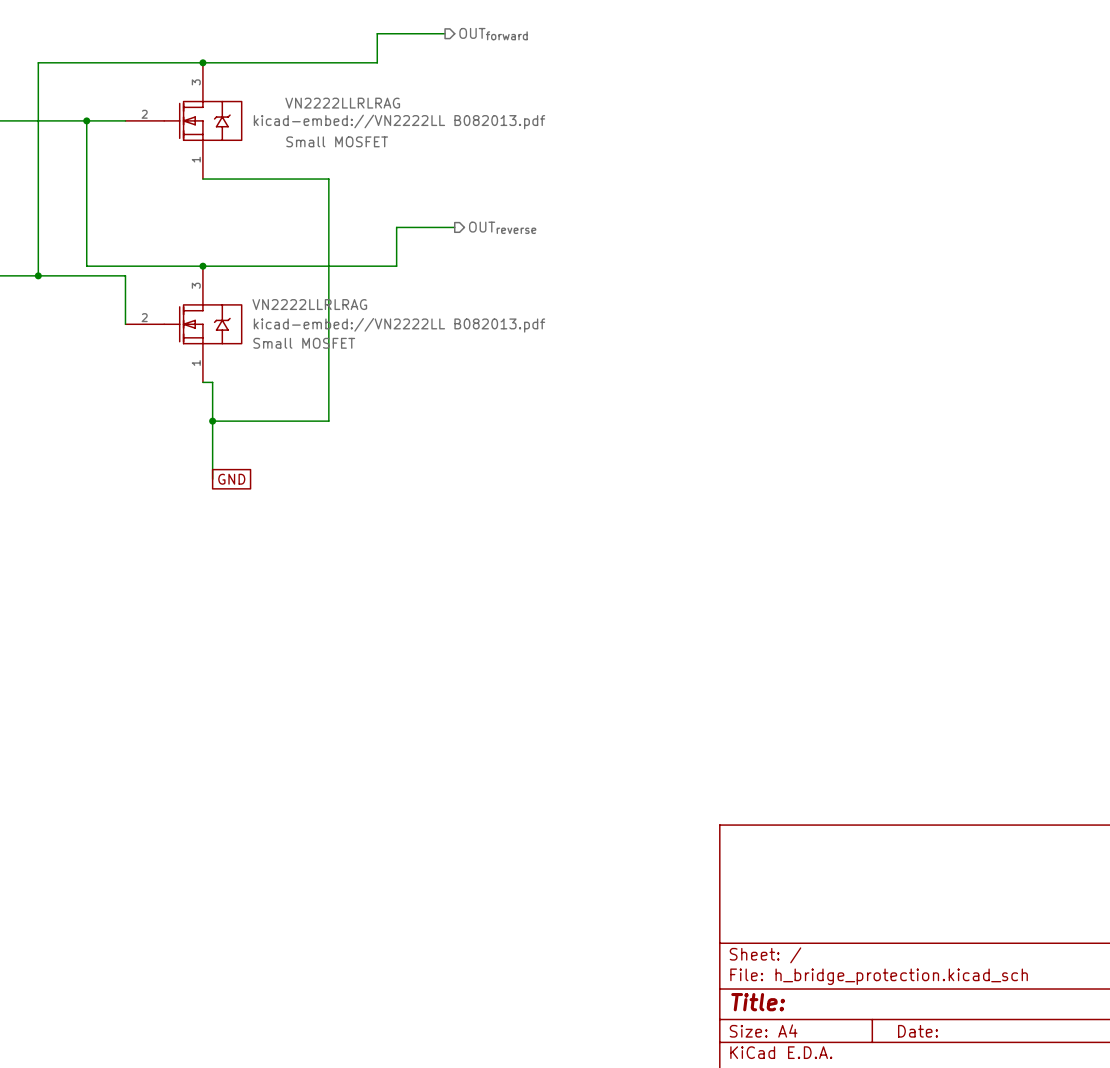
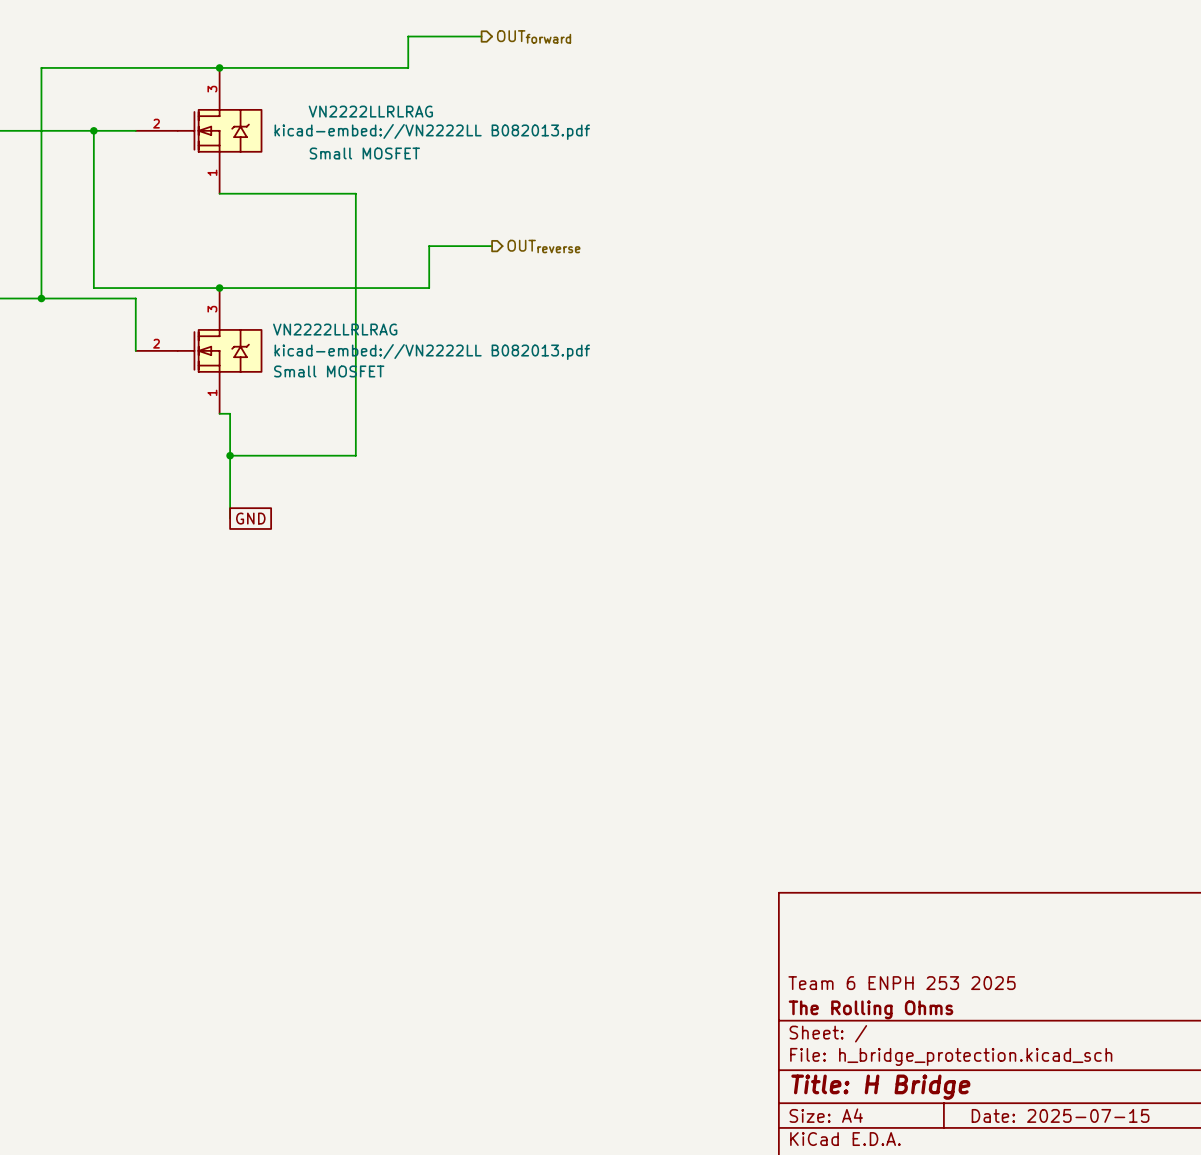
title block: none -> Team 6 ENPH 253 2025 (902, 983)
title block: none -> The Rolling Ohms (870, 1009)
title block: Title: (758, 1002) -> Title: H Bridge (880, 1087)
title block: Date: (918, 1031) -> Date: 2025-07-15 (1060, 1115)

